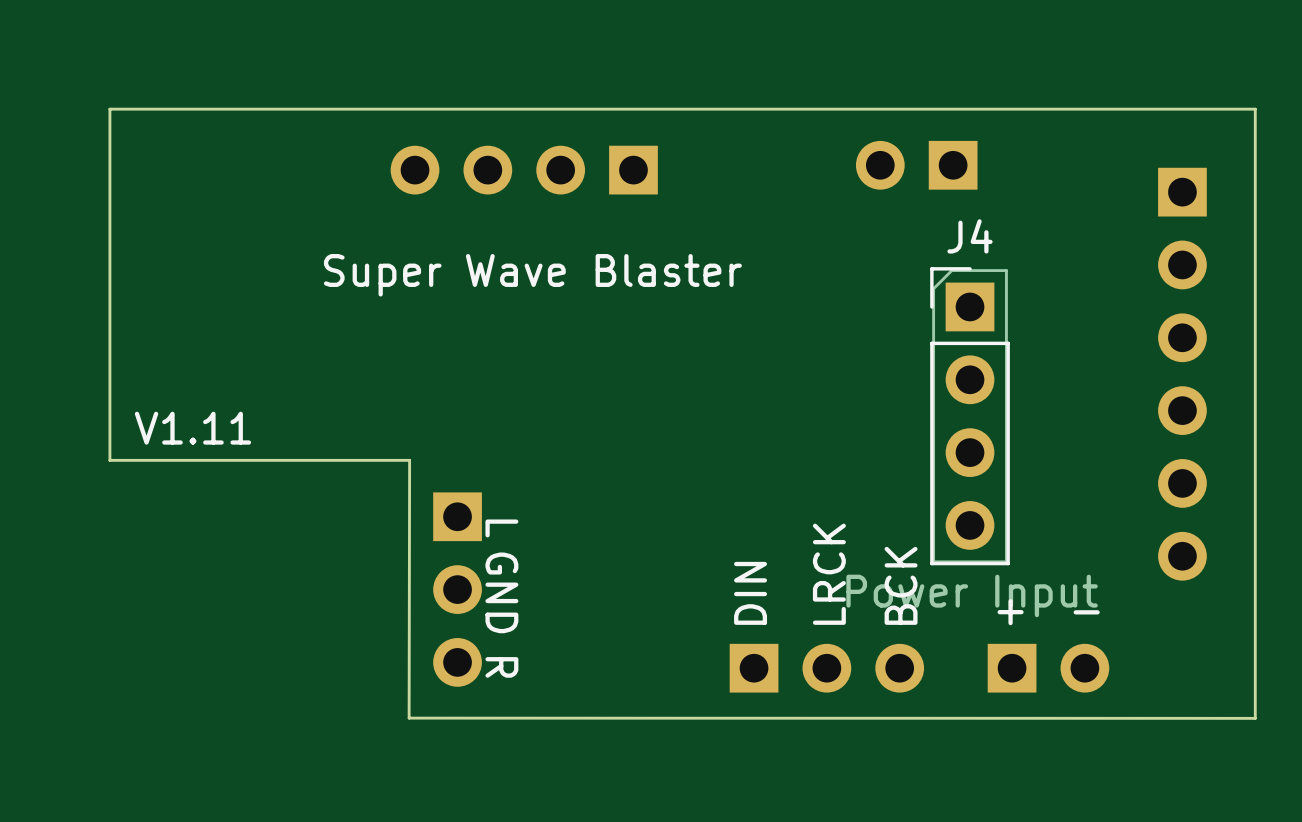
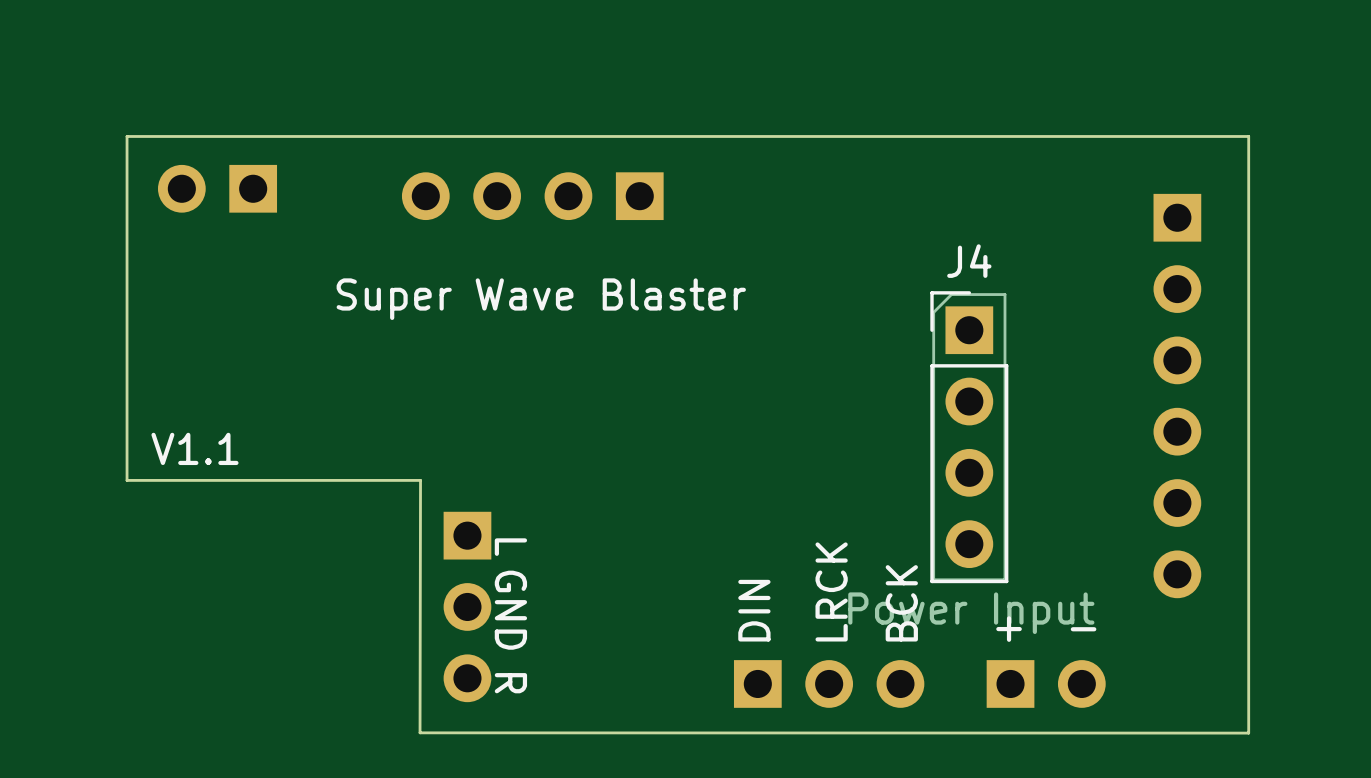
part position: (916, 165) -> (217, 188)
text: V1.11 (192, 428) -> V1.1 (194, 448)

